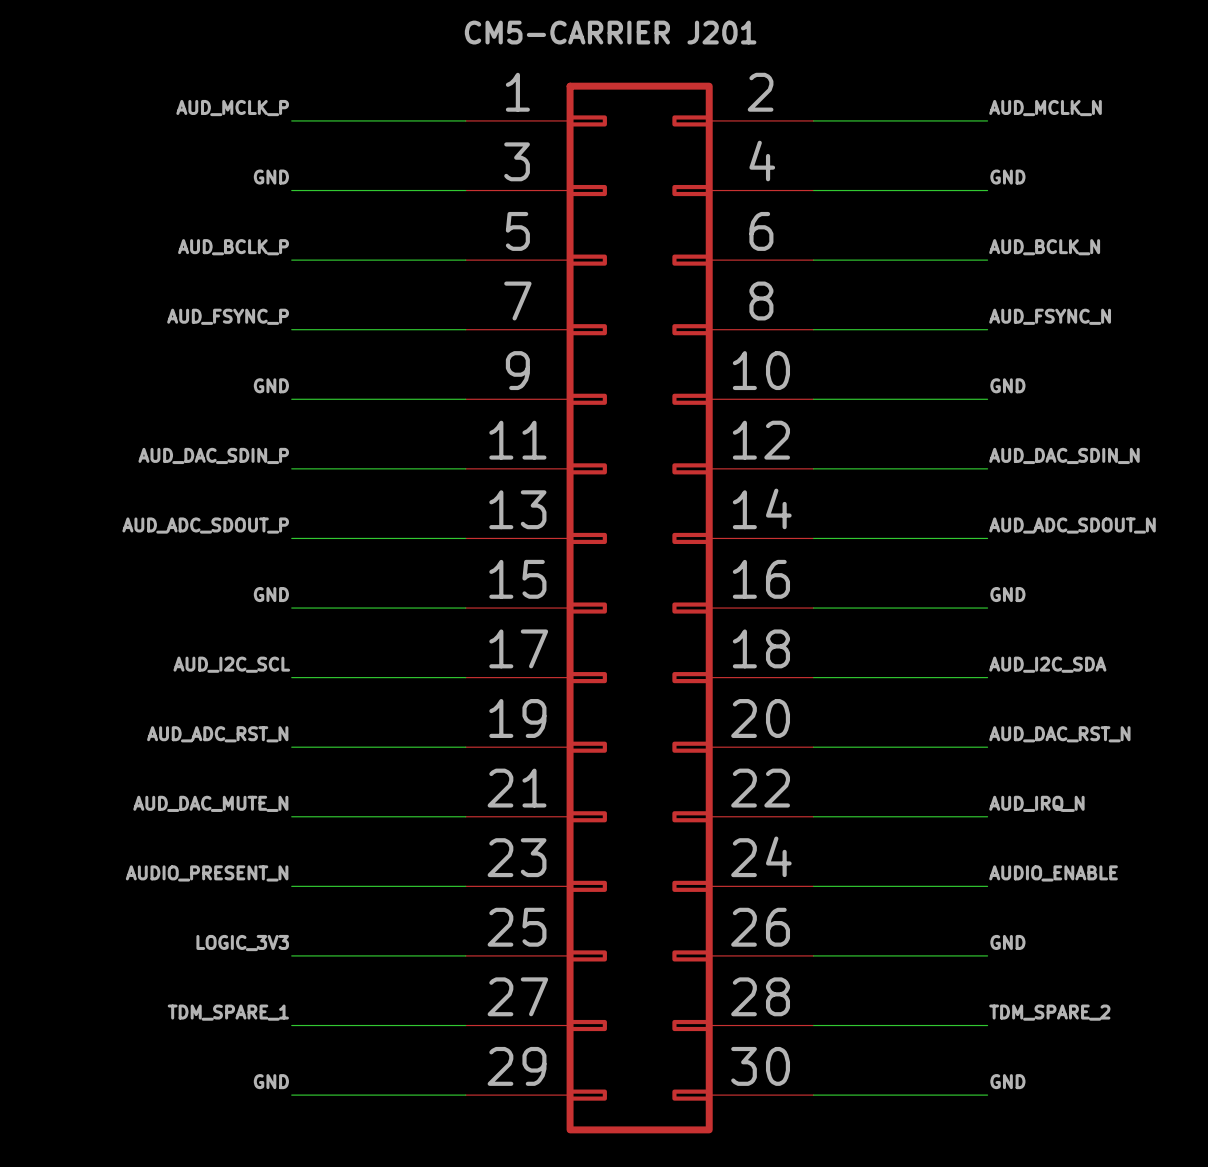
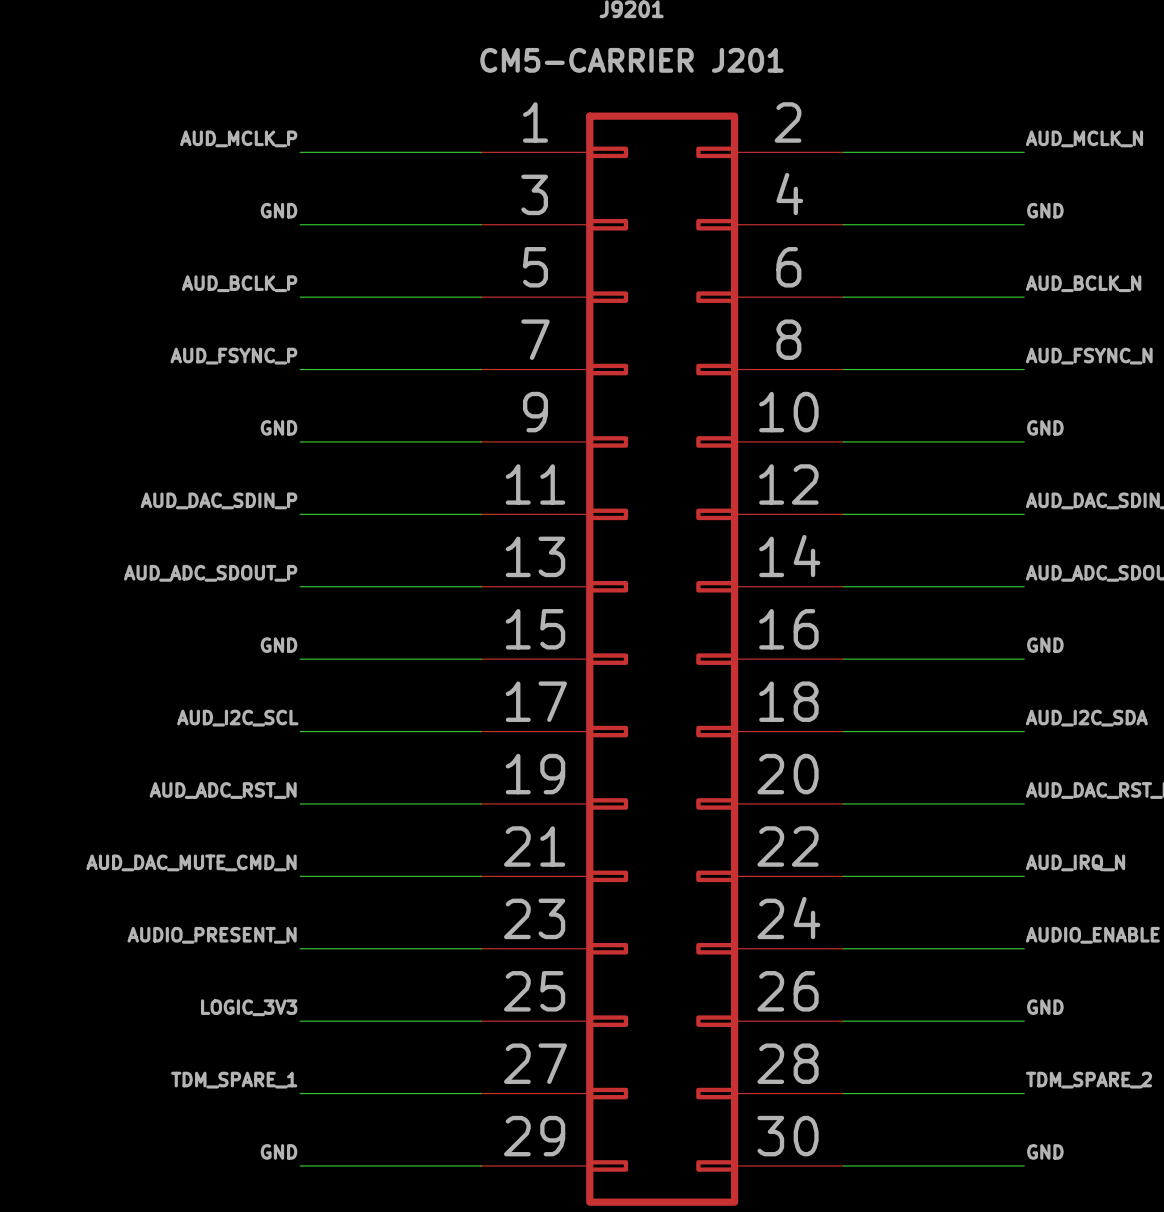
label: AUD_DAC_MUTE_N (210, 803) -> AUD_DAC_MUTE_CMD_N (191, 862)

